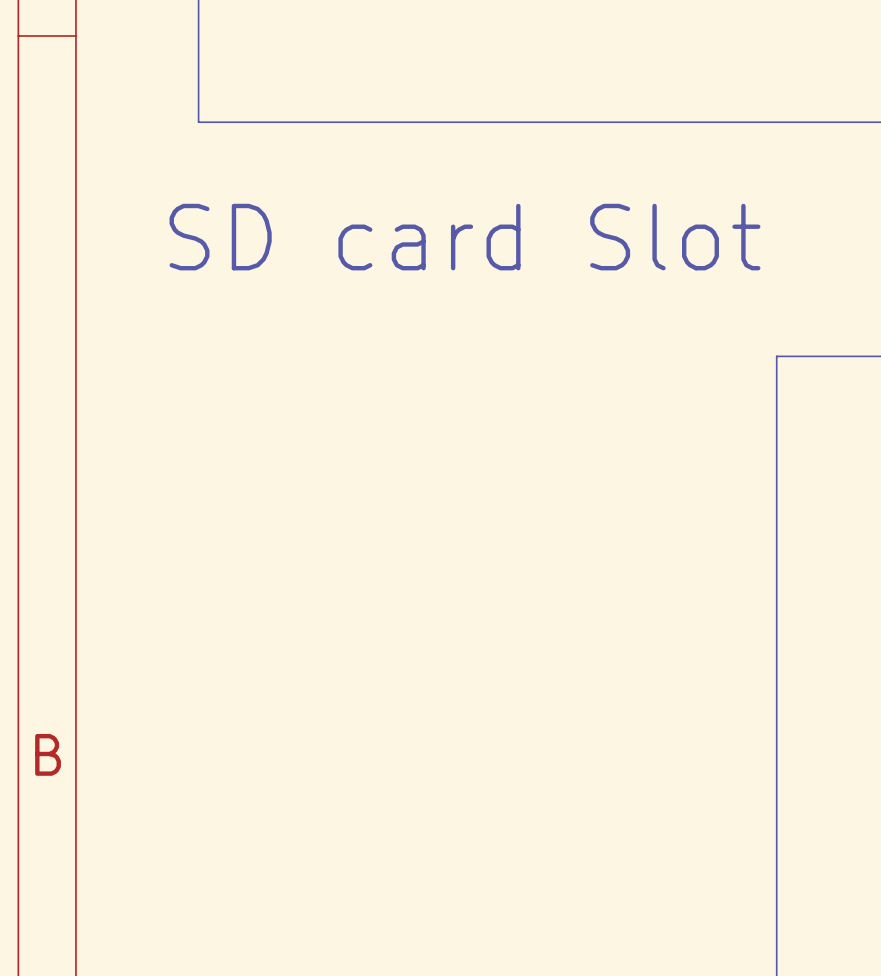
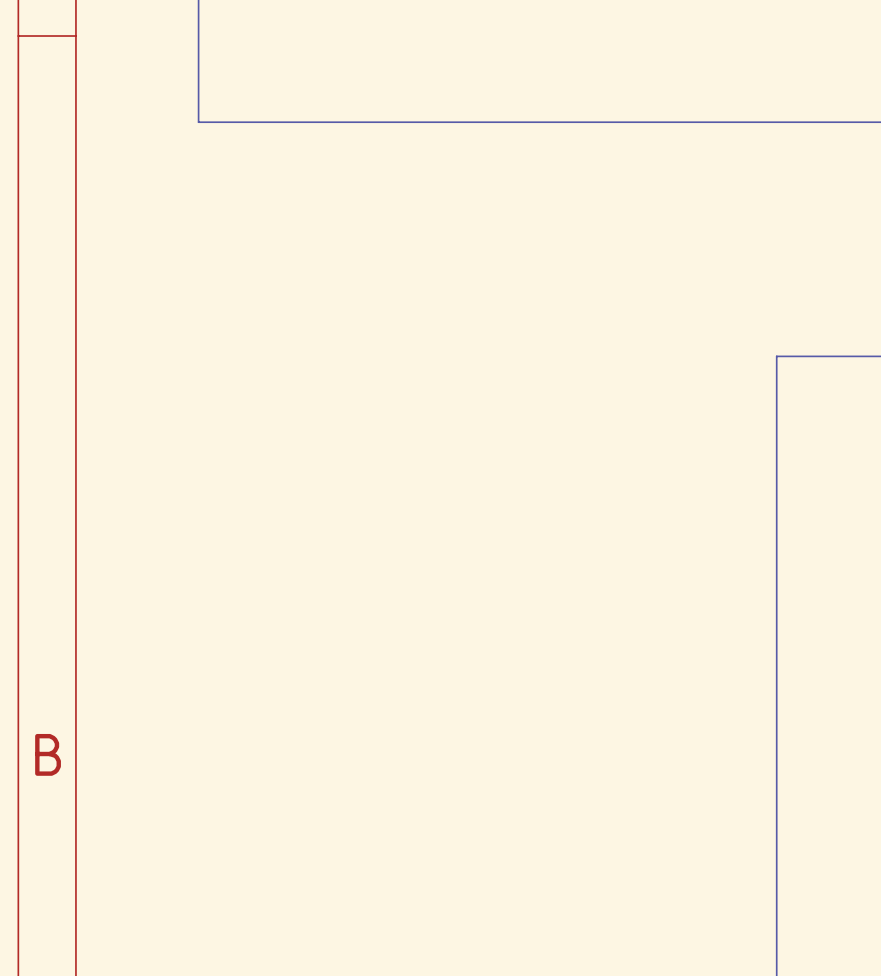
text: SD card Slot (465, 237) -> none

